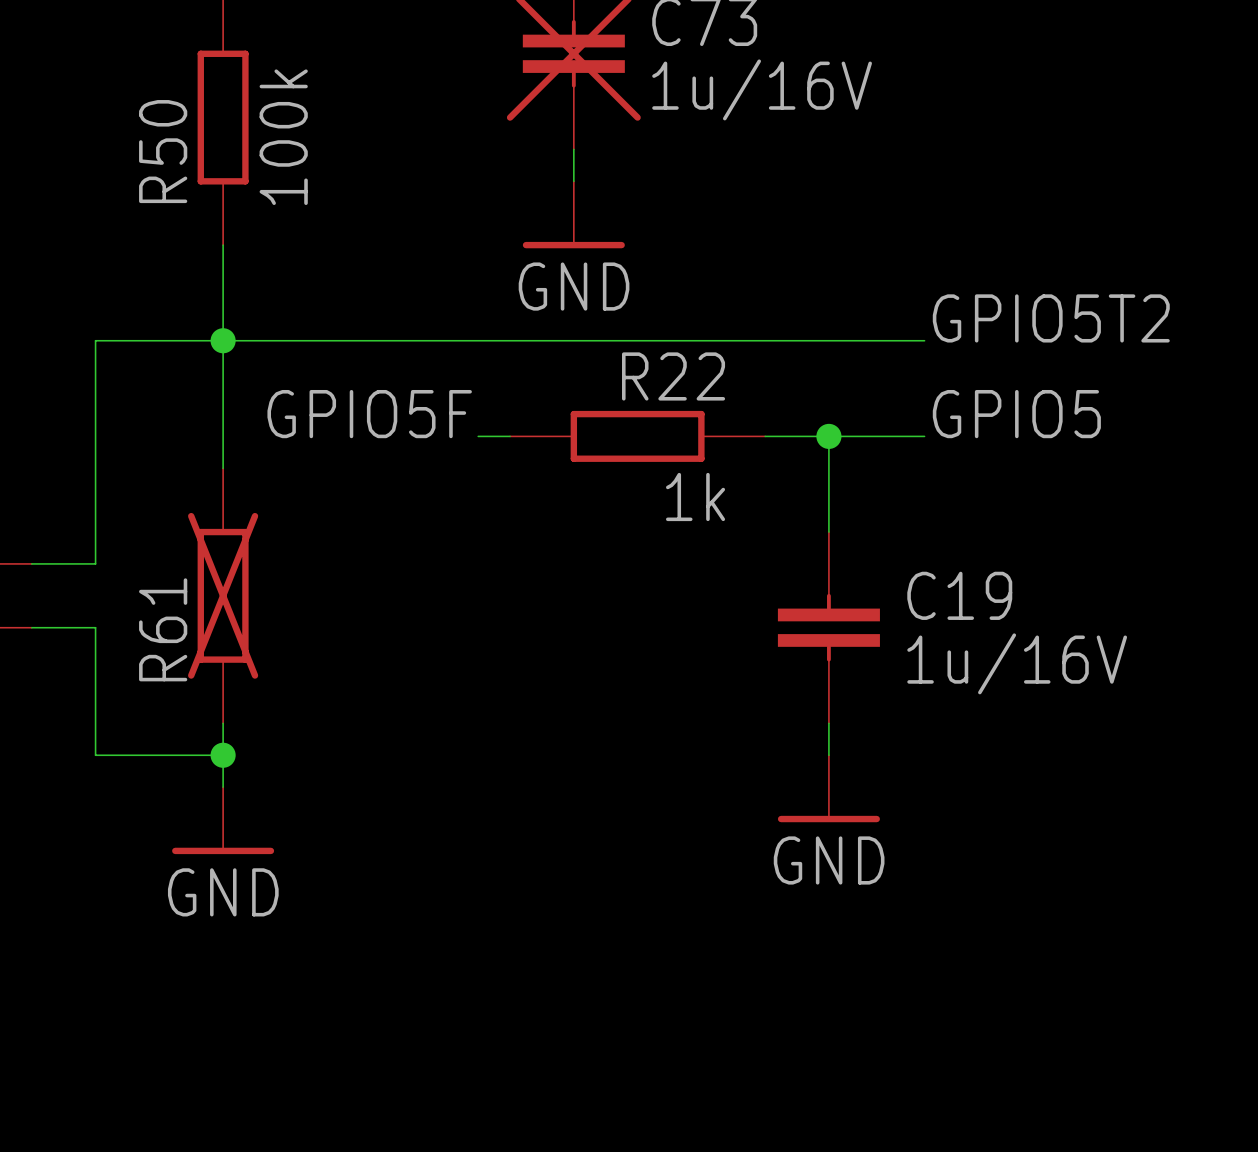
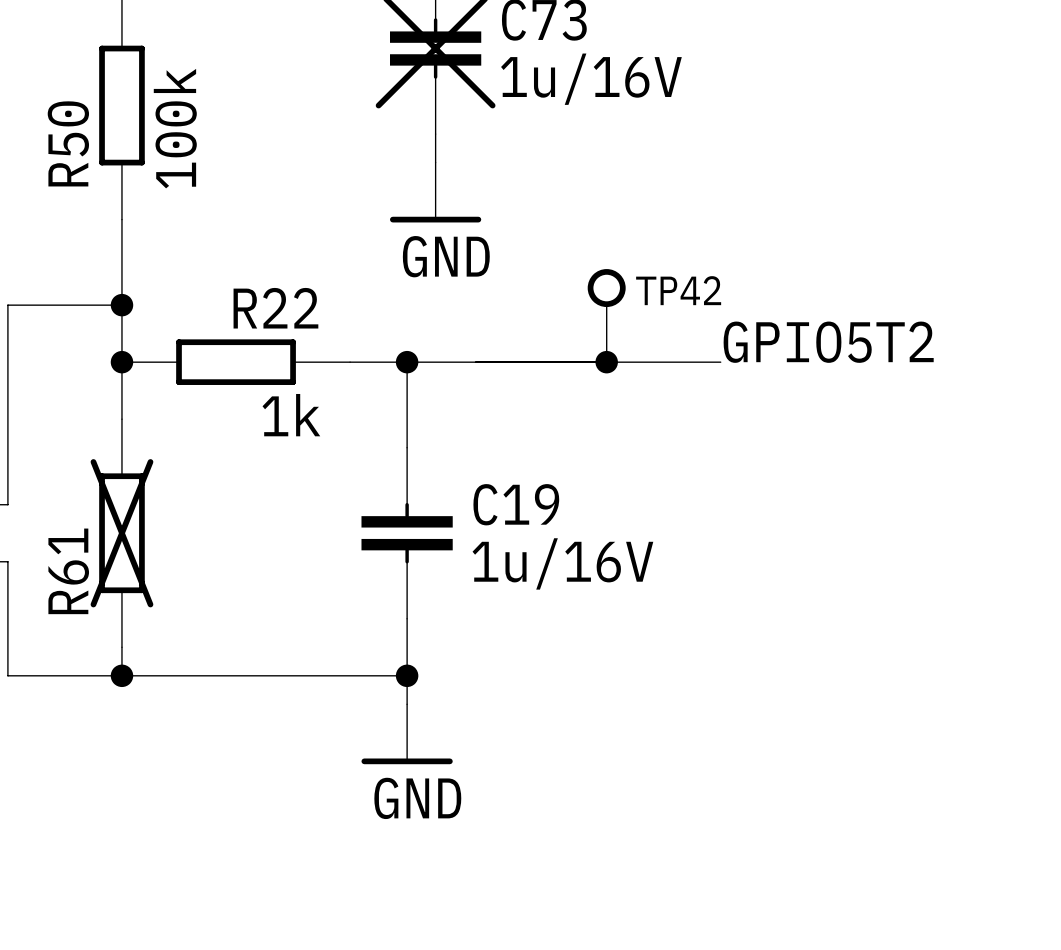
label position: GPIO5T2 (1051, 318) -> GPIO5T2 (828, 342)
wire: (223, 340) (924, 340) -> none
TP42: none -> (606, 315)
junction: none -> (121, 362)
wire: none -> (350, 362) (720, 362)
junction: none -> (407, 362)
label: GPIO5F (369, 414) -> none
label: GPIO5 (1016, 414) -> none
wire: (478, 436) (510, 436) -> none
R22 position: (637, 436) -> (236, 362)
wire: (765, 436) (924, 436) -> none
wire: (828, 436) (828, 532) -> (407, 362) (407, 447)
junction position: (828, 436) -> (606, 362)
C19 position: (828, 627) -> (407, 533)
wire: none -> (407, 618) (407, 704)
wire: (828, 723) (828, 755) -> none
wire: (223, 755) (223, 787) -> (121, 675) (407, 675)
junction: none -> (407, 675)
power symbol: GND (828, 788) -> none
power symbol: GND (223, 820) -> none
power symbol: none -> GND (407, 734)

